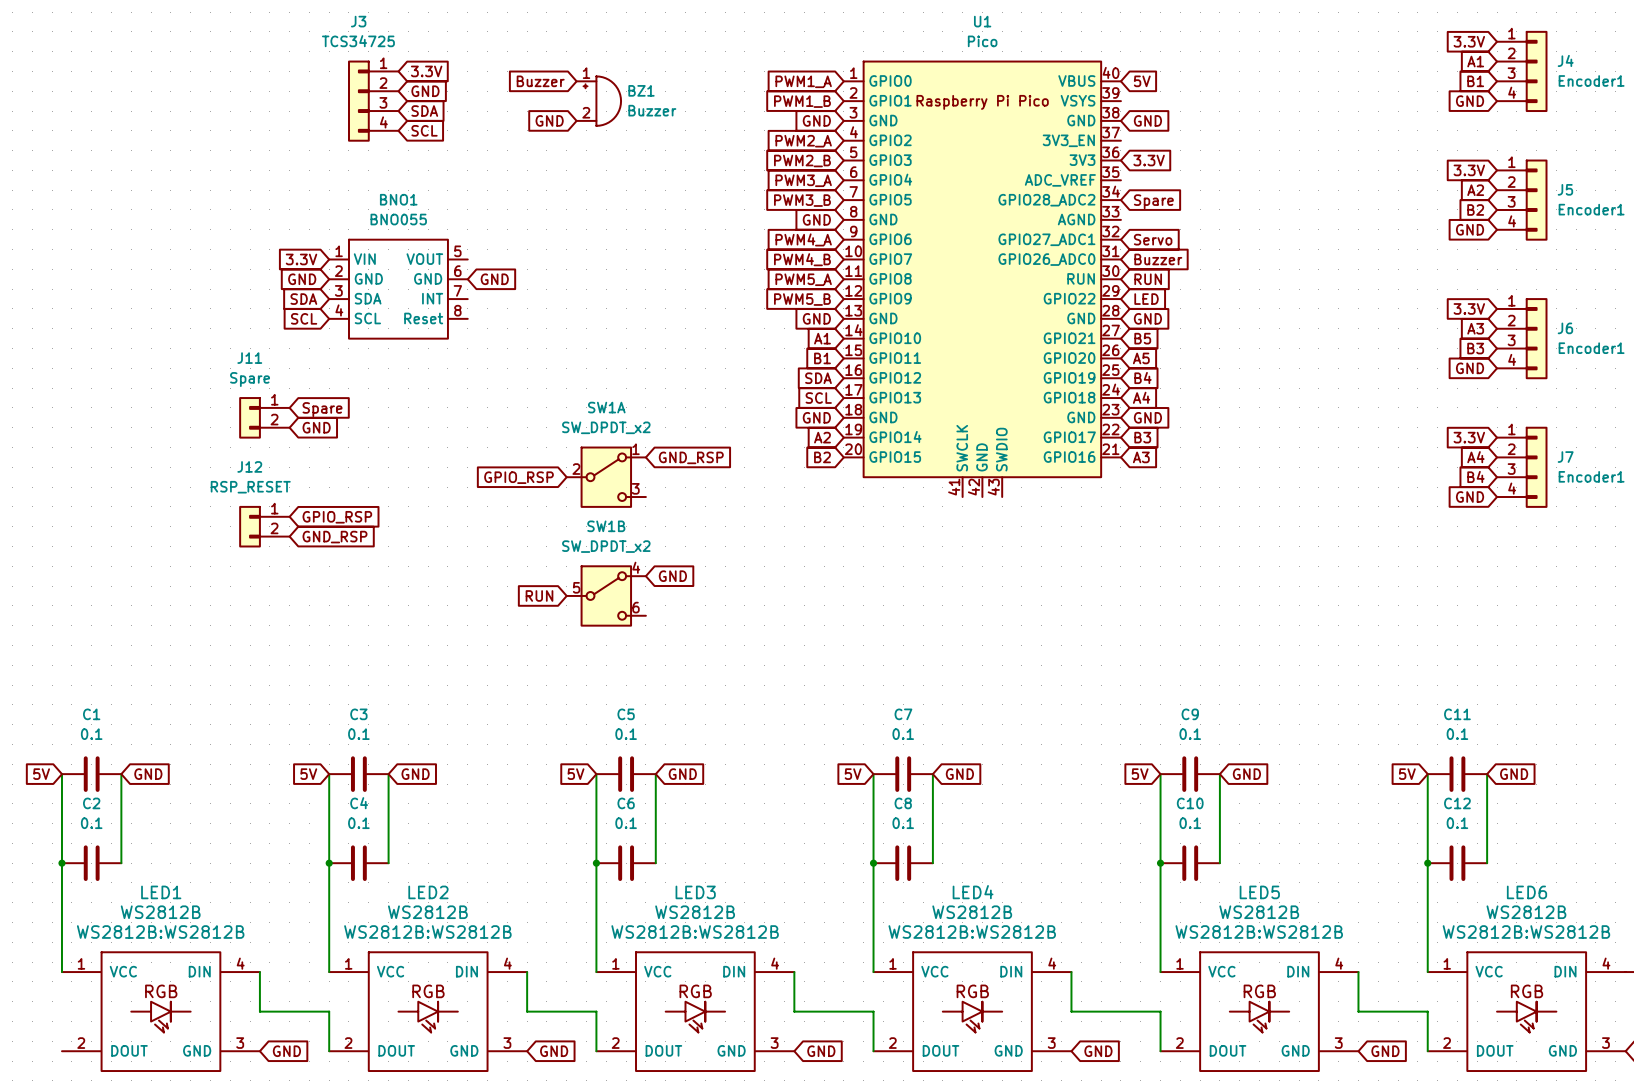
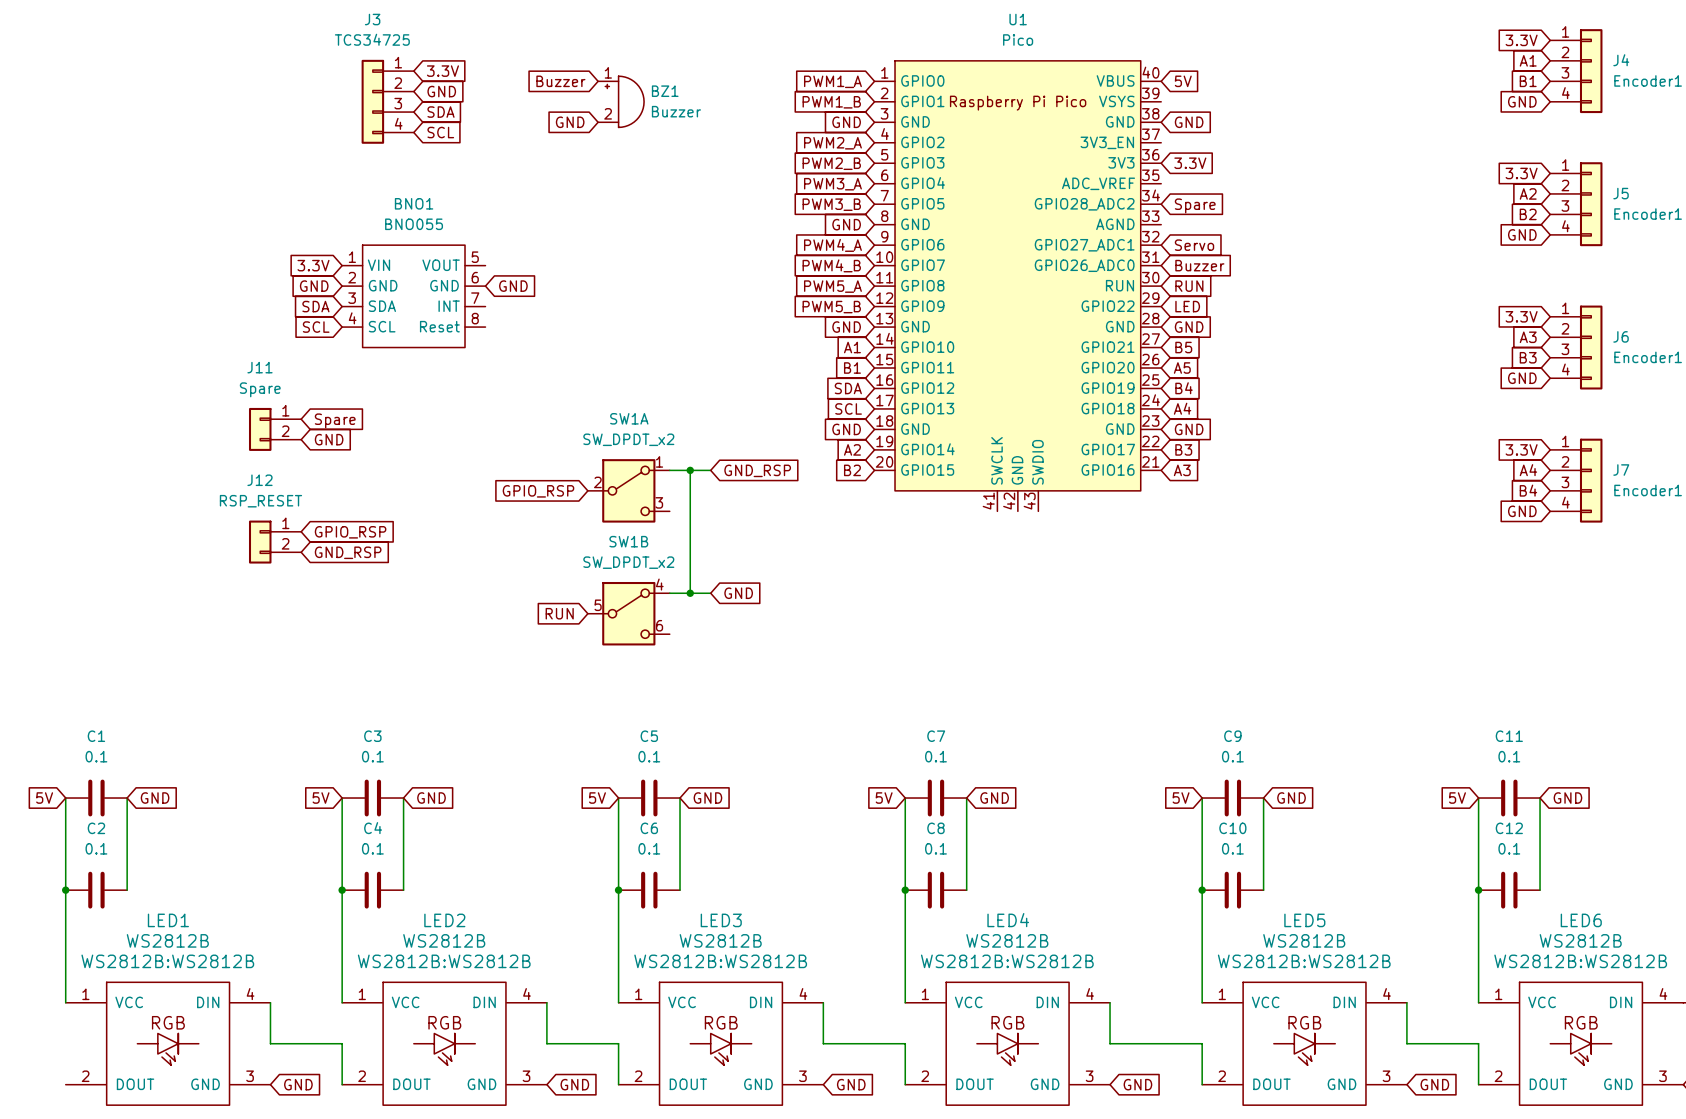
wire: none -> (669, 470) (710, 470)
wire: none -> (690, 470) (690, 593)
junction: none -> (690, 470)
global label position: GND_RSP (691, 457) -> GND_RSP (757, 470)
wire: none -> (669, 593) (710, 593)
junction: none -> (690, 593)
global label position: GND (672, 576) -> GND (738, 593)

